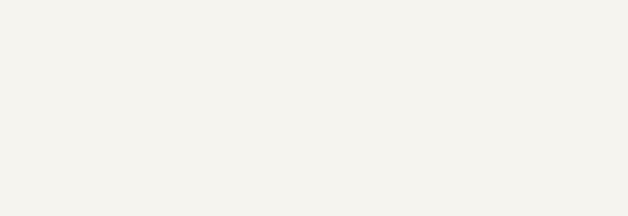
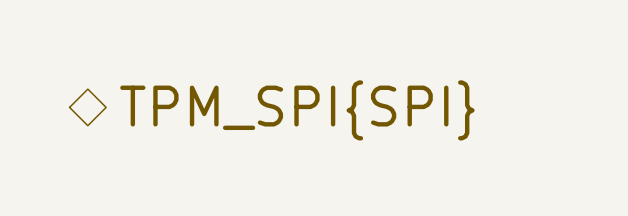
hierarchical label: none -> TPM_SPI{SPI} (297, 110)

